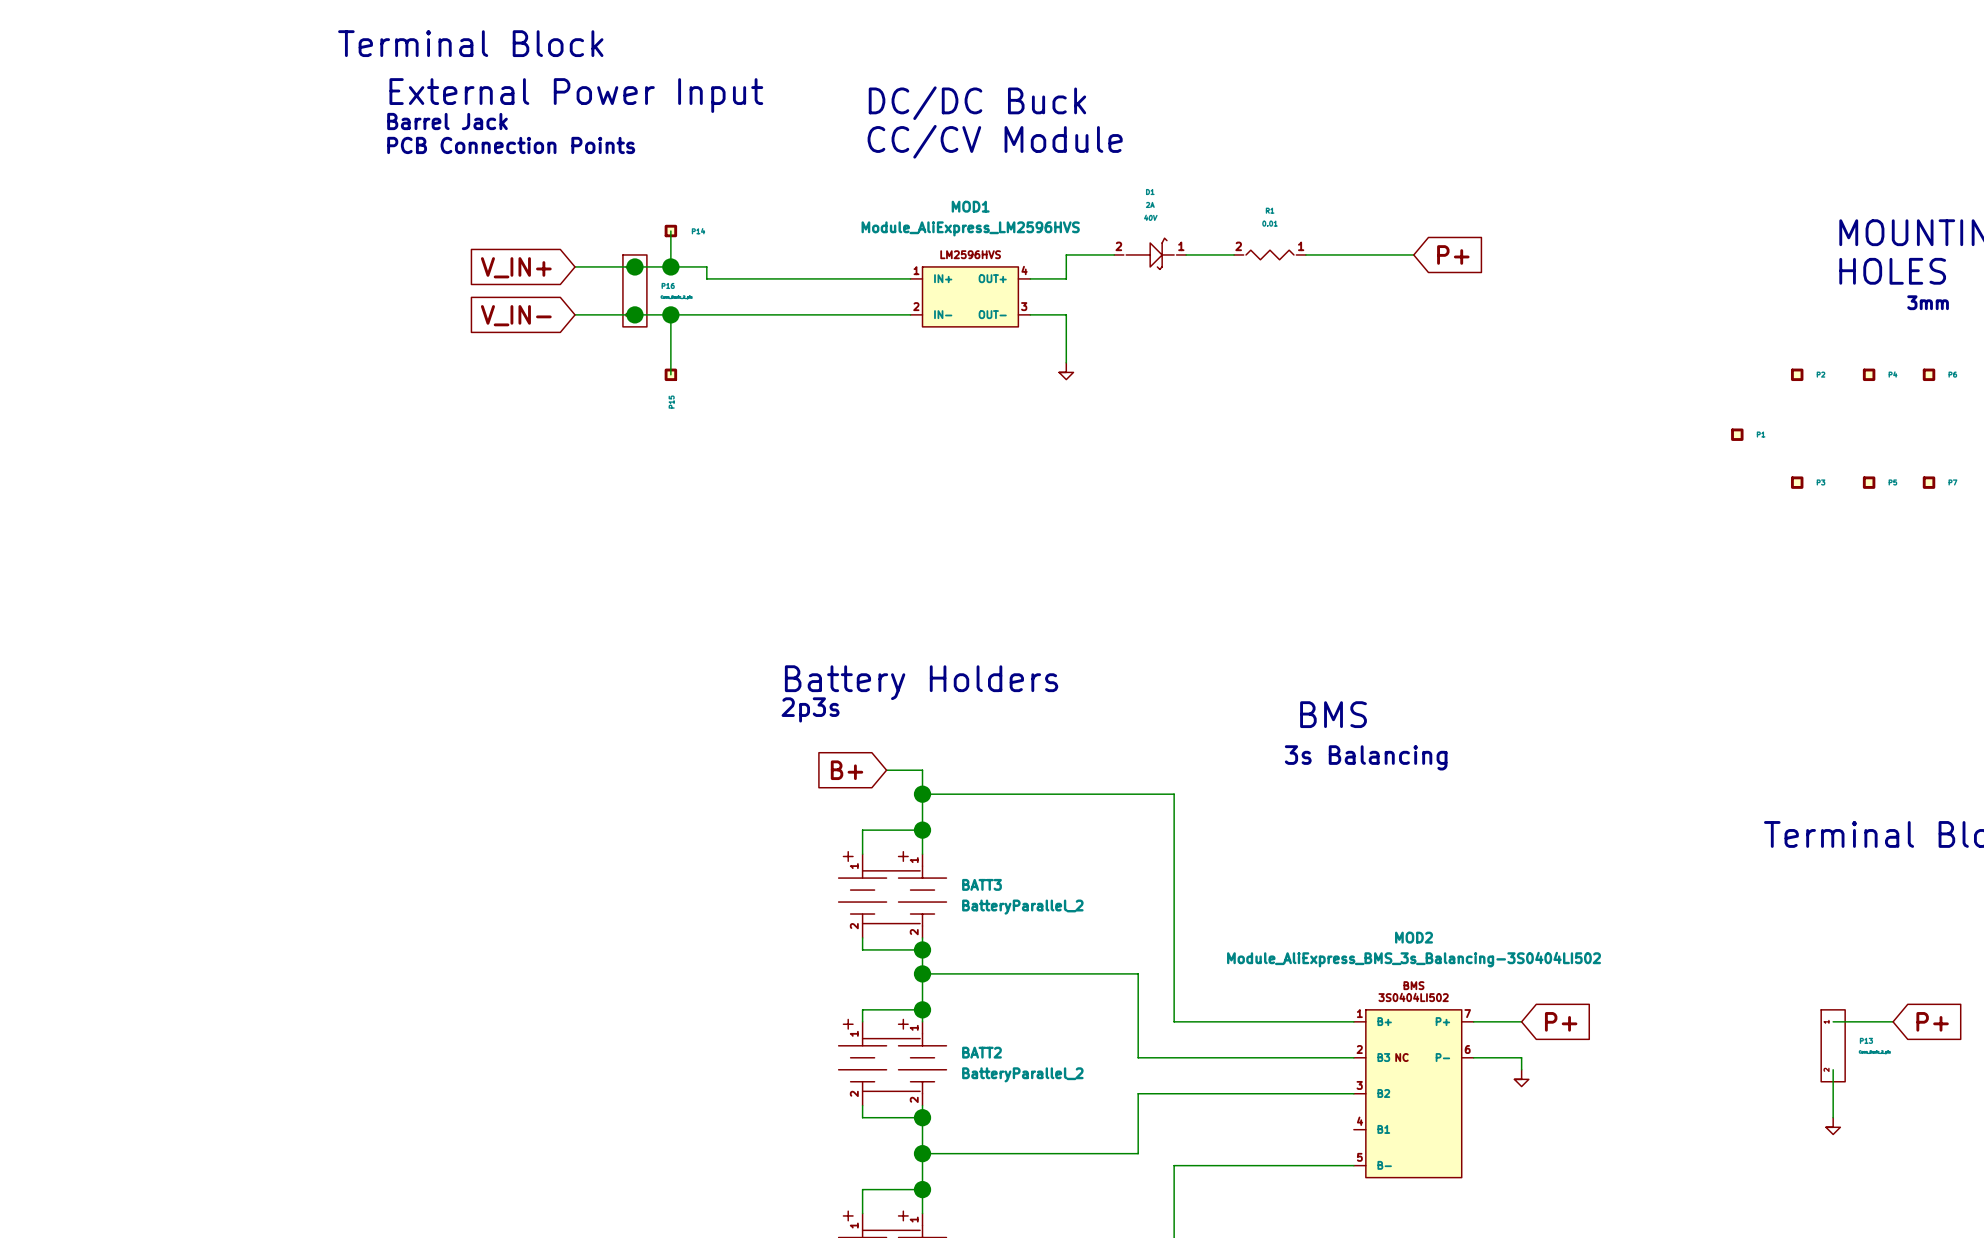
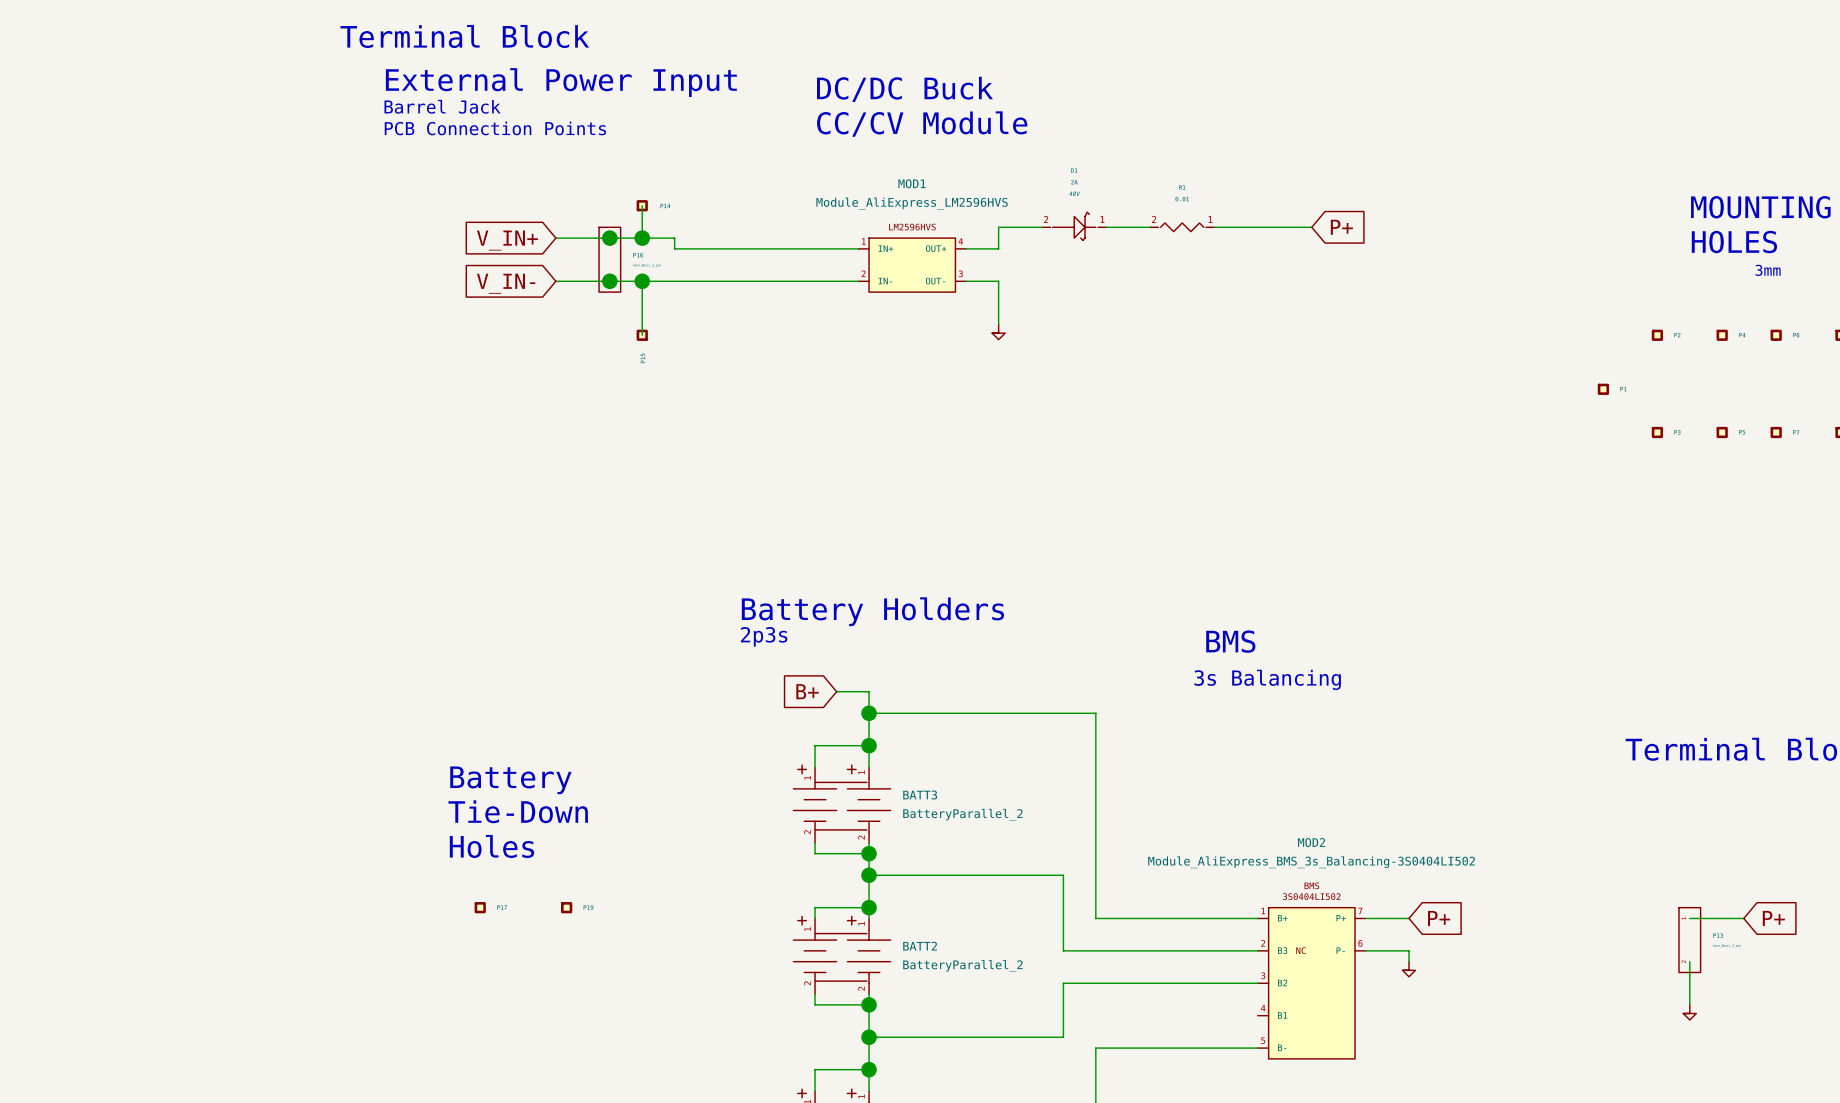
text: none -> Battery (510, 780)
text: none -> Tie-Down (518, 811)
text: none -> Holes (491, 846)
part: none -> (480, 907)
part: none -> (566, 907)

